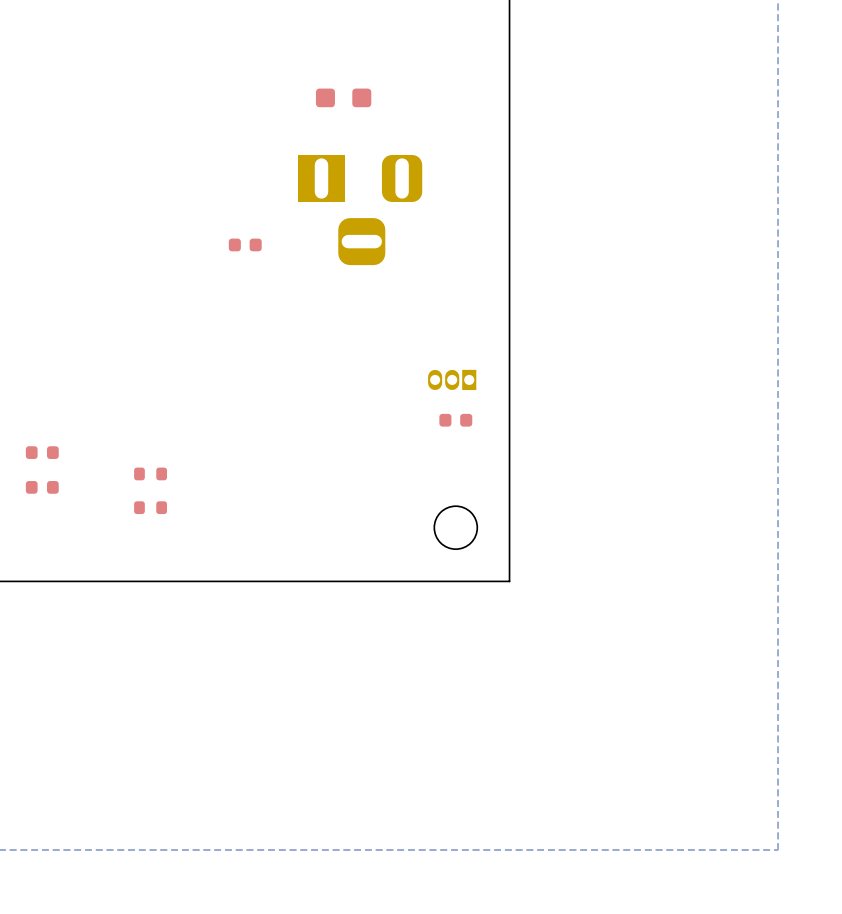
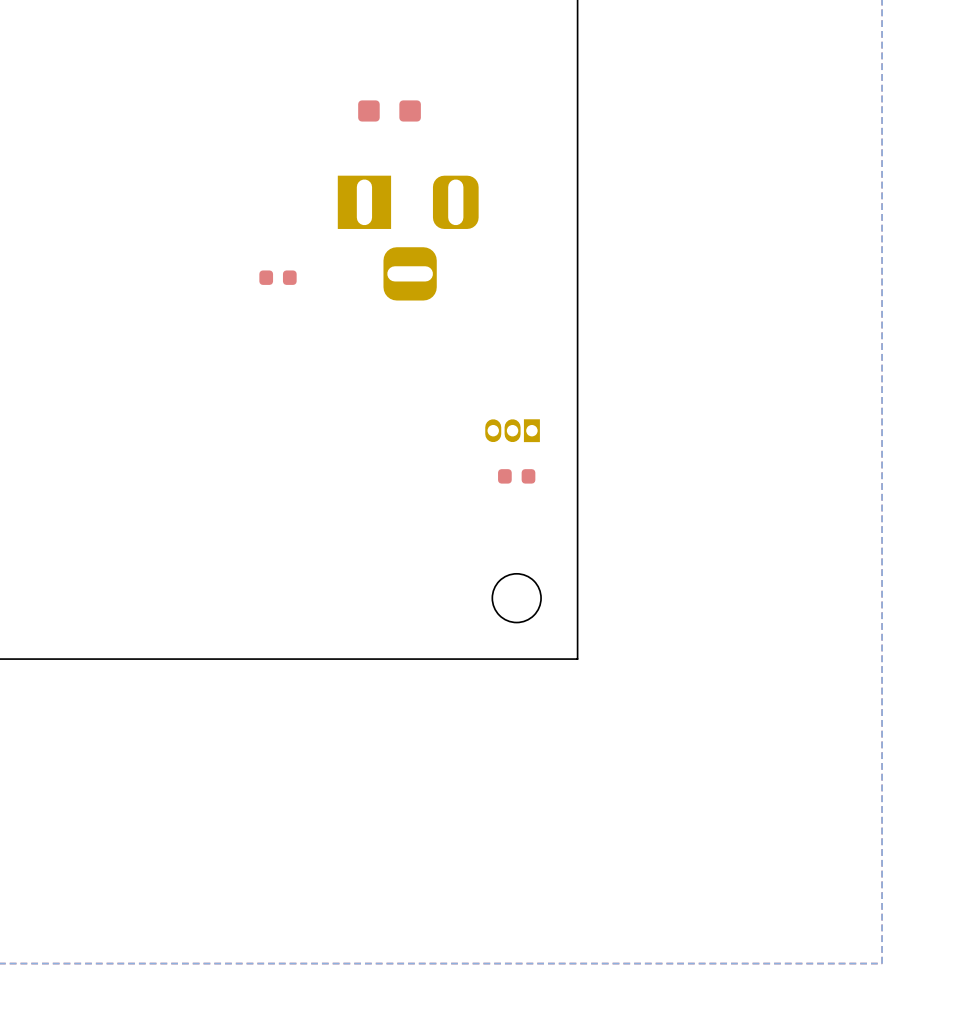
part: (42, 452) -> none
part: (150, 473) -> none
part: (42, 487) -> none
part: (150, 507) -> none

